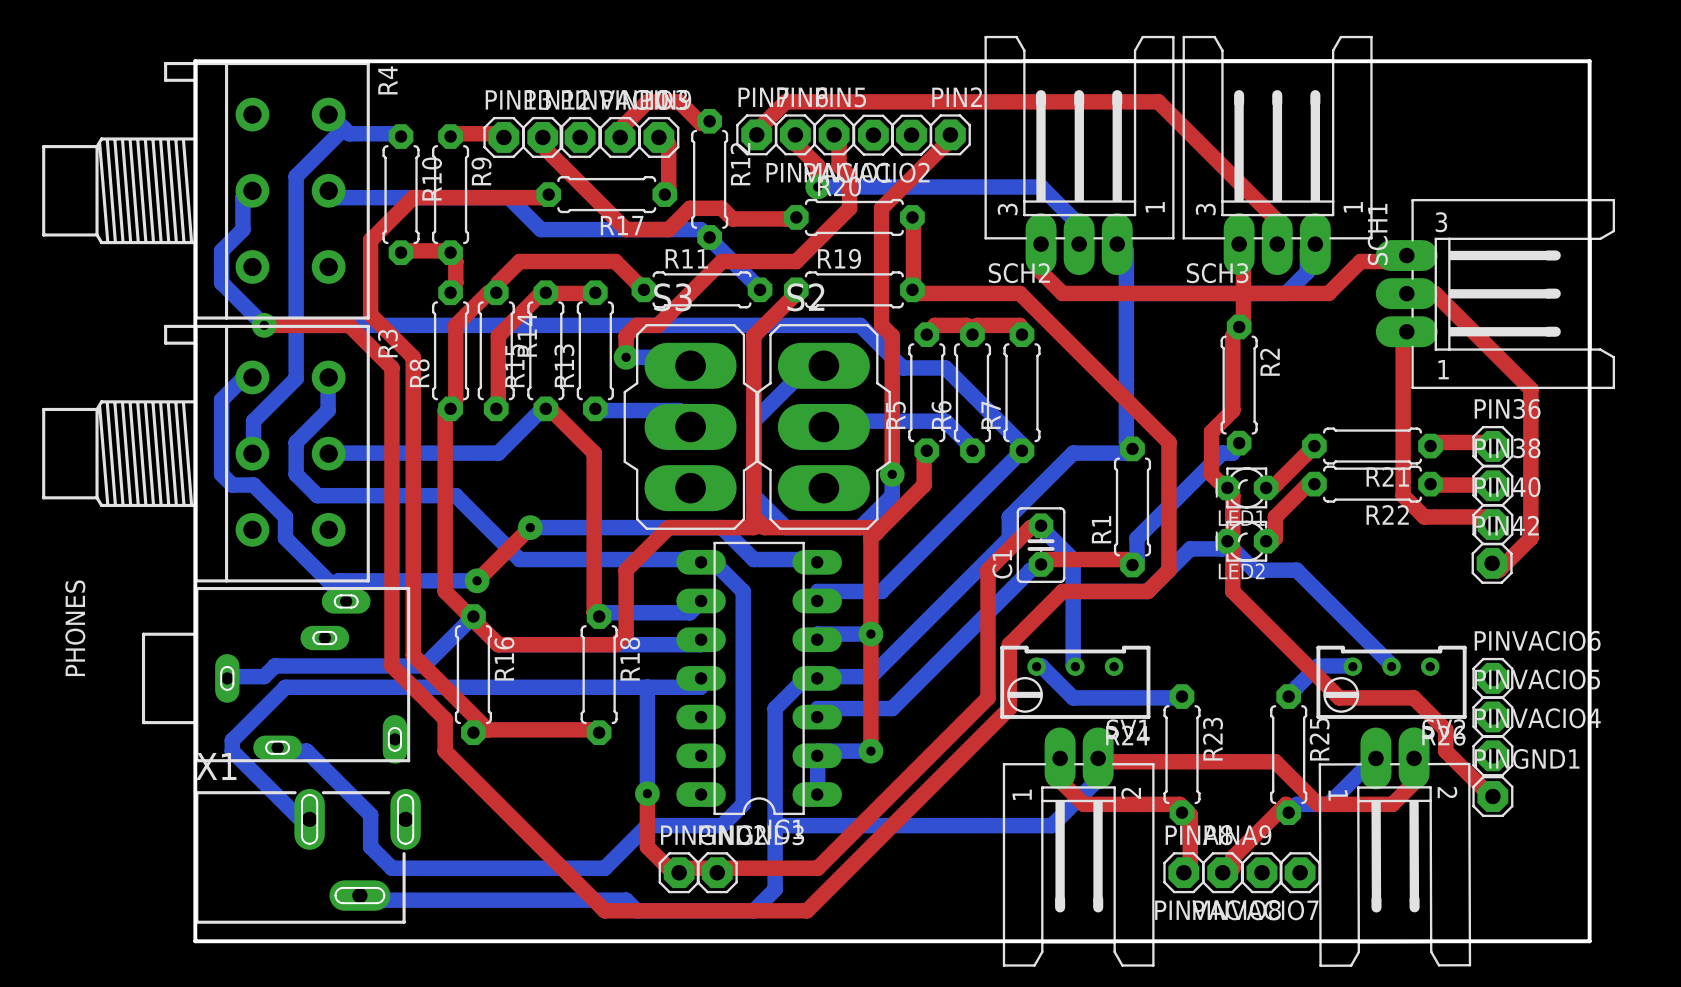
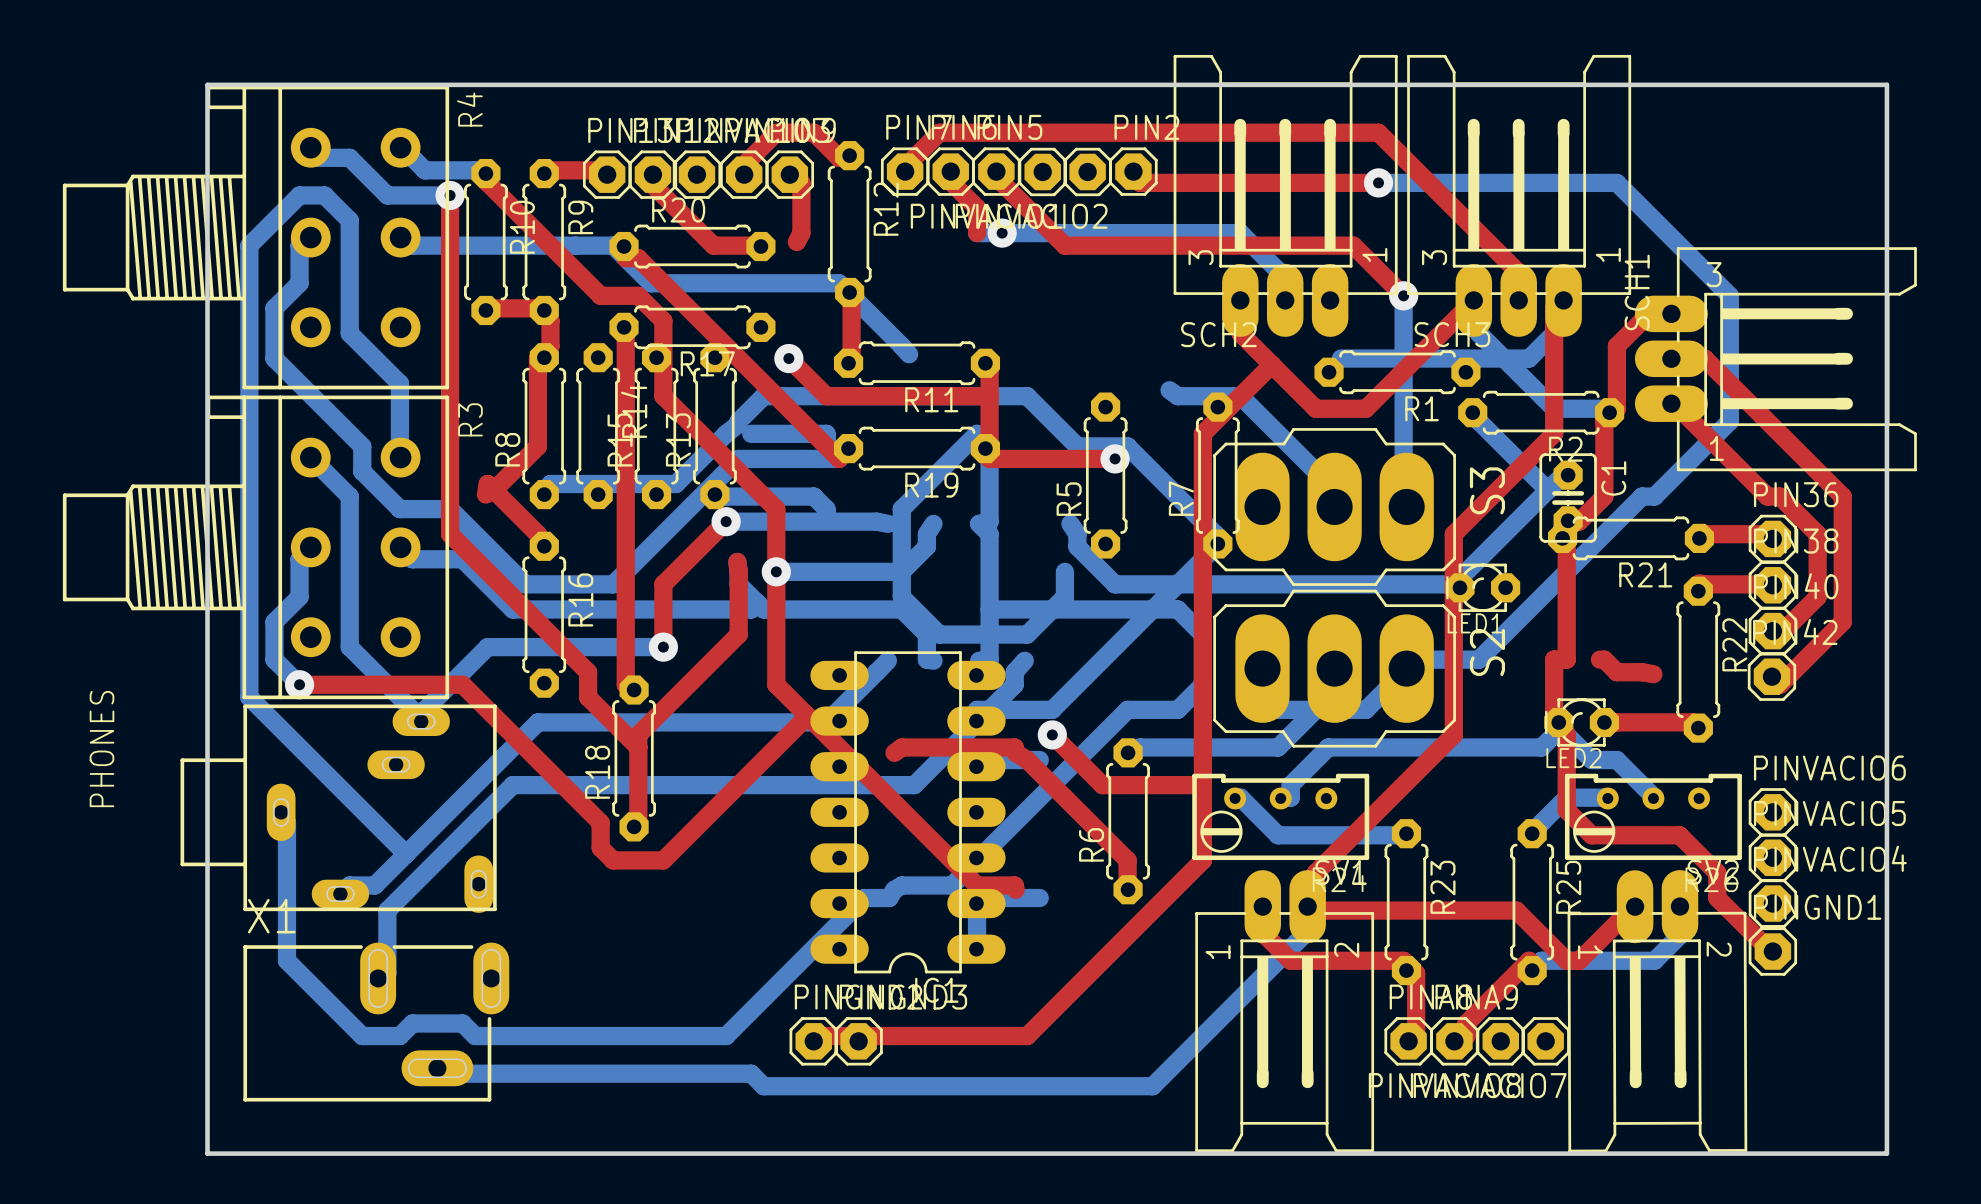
board edge: (195, 61) (195, 941) (1589, 941) -> (243, 84) (207, 84) (207, 1153) (1886, 1153) (1886, 1122)
bottom track: none -> (310, 147) (312, 157) (349, 157) (387, 195) (450, 195)
bottom track: (344, 128) (296, 176) (296, 367) -> none
top track: (950, 134) (945, 144) (881, 208) (881, 325) (892, 336) (892, 474) -> (1133, 171) (1140, 182) (1378, 182)
top track: none -> (485, 173) (487, 182) (600, 295) (638, 295) (663, 320) (663, 396) (776, 509) (776, 684) (977, 885) (1014, 885) (1015, 889)
top track: (839, 144) (839, 165) (849, 176) (849, 208) (796, 261) (721, 261) (658, 325) (636, 325) (626, 336) (626, 357) -> (1002, 182) (1064, 245) (1353, 245) (1403, 295)
bottom track: none -> (1378, 182) (1616, 182) (1729, 295) (1729, 421) (1654, 496) (1642, 496) (1478, 659) (1453, 659)
via: none -> (1378, 182)
via: none -> (450, 195)
via position: (817, 187) -> (1002, 233)
top track: (548, 194) (540, 197) (413, 197) (370, 240) -> (450, 195) (450, 295)
R17 position: (606, 194) -> (692, 327)
top track: (594, 197) (626, 229) (668, 229) (689, 208) (721, 208) (732, 218) (796, 217) -> (713, 245) (760, 246)
top track: none -> (624, 246) (625, 258) (638, 258) (839, 458) (848, 448)
R20 position: (854, 217) -> (692, 246)
top track: (912, 217) (913, 293) (1019, 293) (1168, 442) (1168, 570) (1147, 591) (1062, 591) (1009, 644) -> (1271, 364) (1202, 433) (1202, 772)
top track: none -> (849, 292) (851, 295) (851, 358) (848, 363)
bottom track: none -> (1403, 295) (1403, 496) (1406, 506)
via: none -> (1403, 295)
bottom track: (1117, 244) (1126, 250) (1126, 442) (1132, 448) (1126, 453) (1073, 453) (1009, 516) (1009, 527) -> (989, 609) (1177, 609) (1202, 634)
top track: (1239, 244) (1243, 250) (1243, 325) (1239, 327) (1232, 336) (1232, 410) (1211, 431) (1211, 474) (1227, 487) (1232, 495) (1232, 538) (1227, 541) (1232, 548) (1232, 591) (1317, 676) -> (1554, 659) (1554, 722) (1558, 722) (1566, 734) (1566, 810)
bottom track: none -> (1473, 300) (1478, 308) (1478, 333) (1554, 408) (1604, 408) (1609, 412)
top track: none -> (1563, 300) (1554, 308) (1554, 433) (1453, 534) (1453, 734) (1315, 872) (1315, 898) (1307, 906)
R11 name position: R11 (686, 258) -> R11 (931, 399)
R19 name position: R19 (839, 258) -> R19 (931, 485)
top track: (1381, 261) (1360, 261) (1328, 293) (1062, 293) -> (1473, 300) (1365, 408) (1315, 408) (1265, 358)
top track: none -> (1642, 320) (1616, 346) (1616, 408) (1609, 412) (1604, 421) (1604, 496) (1579, 521) (1566, 521) (1566, 659) (1554, 659)
top track: none -> (624, 327) (625, 333) (625, 684) (634, 690)
bottom track: (221, 282) (264, 325) -> (274, 346) (274, 358) (362, 446)
top track: (643, 289) (615, 261) (519, 261) (498, 282) (496, 292) (487, 293) (455, 325) (455, 399) (450, 408) (445, 410) (445, 591) (466, 612) (473, 616) (477, 623) (498, 644) (615, 644) (626, 634) (626, 570) (668, 527) (753, 527) (759, 522) -> none
R11 position: (702, 289) -> (917, 363)
top track: (796, 289) (796, 293) (753, 336) (753, 516) (764, 527) (870, 527) (876, 532) -> none
R19 position: (854, 289) -> (917, 448)
top track: none -> (548, 357) (537, 358) (537, 446) (494, 490)
top track: (595, 292) (540, 293) (498, 336) (498, 399) (496, 408) -> none
top track: none -> (788, 358) (826, 396) (989, 396)
via: none -> (788, 358)
top track: none -> (985, 363) (989, 371) (989, 446) (985, 448) (989, 458) (1115, 458)
top track: (370, 314) (413, 357) (413, 655) (487, 729) -> (450, 383) (450, 534) (588, 672) (588, 697) (638, 747)
bottom track: none -> (1169, 390) (1177, 396) (1240, 396) (1340, 496) (1334, 506)
top track: (264, 325) (349, 325) (391, 367) (391, 665) (445, 719) (445, 751) (604, 910) (807, 910) (1009, 708) -> none
via: (264, 325) -> none
bottom track: (296, 325) (636, 325) -> (548, 494) (550, 484) (675, 484) (737, 425) (738, 421) (763, 396)
top track: (1406, 331) (1403, 336) (1403, 495) (1424, 516) (1488, 516) (1492, 524) -> (1671, 403) (1679, 408) (1767, 496) (1780, 496) (1817, 534)
top track: (926, 334) (934, 325) (966, 325) (972, 334) (977, 325) (1019, 325) (1022, 334) -> none
bottom track: none -> (1472, 412) (1478, 421) (1547, 490)
via: (626, 357) -> none
bottom track: none -> (848, 448) (839, 458) (738, 458) (613, 584) (525, 584) (450, 509) (399, 509) (362, 471) (362, 458)
bottom track: none -> (985, 448) (989, 458) (989, 521) (979, 523) (989, 534) (989, 659) (979, 660)
bottom track: (252, 377) (242, 378) (221, 399) (221, 474) (232, 485) (253, 485) (285, 516) -> (310, 457) (349, 496) (349, 622)
bottom track: (328, 377) (328, 410) (296, 442) (296, 474) (317, 495) (455, 495) (519, 559) (700, 559) (701, 562) (711, 559) (743, 591) (743, 804) (721, 825) (647, 825) -> (400, 457) (399, 383) (349, 333) (349, 220) (324, 195) (299, 195) (249, 245) (249, 697) (406, 854)
bottom track: (296, 378) (253, 421) (252, 453) -> (299, 684) (274, 659) (274, 622) (299, 596) (299, 559) (310, 547)
via: none -> (1115, 458)
R2 rotation: 0° (1239, 385) -> 90° clockwise (1541, 412)
top track: (1530, 389) (1530, 442) -> (1817, 471) (1842, 496) (1842, 622) (1817, 647)
R6 position: (972, 392) -> (1128, 821)
bottom track: none -> (1568, 475) (1566, 471) (1453, 584) (1115, 584) (1077, 546) (1077, 534) (1070, 523)
top track: none -> (485, 494) (487, 484) (537, 534) (544, 546)
top track: (545, 408) (551, 410) (594, 453) (594, 612) (599, 616) -> none
bottom track: (545, 408) (540, 410) (498, 453) (328, 453) -> (757, 603) (751, 609) (512, 609) (462, 559) (412, 559) (400, 547)
S3 rotation: 0° (690, 426) -> 90° clockwise (1334, 506)
S3 position: (690, 426) -> (1334, 506)
bottom track: (823, 426) (828, 421) (945, 421) (972, 450) -> none
S2 rotation: 0° (823, 426) -> 90° clockwise (1334, 668)
S2 position: (823, 426) -> (1334, 668)
top track: none -> (726, 521) (663, 584) (663, 647)
bottom track: none -> (726, 521) (876, 521) (887, 523)
via: none -> (726, 521)
bottom track: none -> (933, 523) (926, 534) (926, 546) (901, 571) (776, 571)
bottom track: (1239, 443) (1232, 453) (1222, 453) (1137, 538) (1137, 559) (1132, 565) -> none
top track: (1314, 446) (1275, 485) (1266, 487) -> none
top track: (926, 450) (924, 453) (924, 485) (870, 538) (870, 751) -> none
top track: none -> (737, 561) (738, 634) (638, 734) (638, 822) (634, 826)
bottom track: none -> (737, 561) (738, 584) (763, 609) (901, 609) (926, 634) (926, 659) (933, 660)
via: none -> (776, 571)
via: (892, 474) -> none
top track: (1314, 484) (1307, 485) (1275, 516) (1275, 538) (1266, 541) -> none
R22 rotation: 0° (1372, 484) -> 90° clockwise (1698, 659)
R22 position: (1372, 484) -> (1698, 659)
top track: (1530, 495) (1530, 538) -> (1817, 596) (1780, 634) (1772, 631)
R1 rotation: 0° (1132, 506) -> 90° clockwise (1397, 372)
R1 position: (1132, 506) -> (1397, 372)
R22 name position: R22 (1387, 514) -> R22 (1734, 644)
top track: (1041, 525) (1030, 527) (988, 570) (988, 697) (817, 868) -> (1202, 847) (1202, 860) (1027, 1036) (977, 1036)
bottom track: (1041, 525) (1073, 559) (1073, 665) (1075, 666) -> none
top track: (530, 527) (477, 580) -> none
bottom track: (530, 527) (721, 527) (753, 559) (807, 559) (817, 562) -> none
via position: (530, 527) -> (663, 647)
R1 name position: R1 (1101, 529) -> R1 (1422, 408)
bottom track: none -> (663, 647) (487, 647) (425, 709) (421, 721)
bottom track: (1009, 538) (870, 676) (817, 676) (817, 678) (807, 676) (775, 708) (775, 889) (753, 910) -> (1202, 647) (1202, 684) (1177, 709) (1127, 709) (951, 885) (901, 885) (894, 889) (889, 898) (864, 898) (776, 985)
LED2 position: (1246, 541) -> (1581, 722)
C1 position: (1041, 545) -> (1568, 497)
bottom track: (1222, 548) (1227, 541) (1254, 570) (1296, 570) (1360, 634) -> (1280, 798) (1290, 797) (1290, 785) (1328, 747) (1541, 747) (1554, 734) (1558, 722) (1566, 734) (1591, 760) (1616, 760)
top track: none -> (1599, 659) (1604, 659) (1616, 672) (1653, 674)
bottom track: none -> (887, 660) (826, 722) (537, 722) (374, 885) (349, 885) (340, 894)
bottom track: none -> (1334, 668) (1328, 672) (1328, 697) (1278, 747) (1140, 747) (1128, 752)
C1 name position: C1 (1002, 564) -> C1 (1613, 478)
top track: (1041, 564) (1041, 559) (1126, 559) (1132, 565) -> none
bottom track: (1041, 564) (1030, 570) (892, 708) (817, 708) (817, 717) -> none
top track: none -> (299, 684) (462, 684) (600, 822) (600, 847) (613, 860) (663, 860) (807, 716)
via: none -> (299, 684)
bottom track: (477, 580) (338, 580) (333, 586) -> none
via: (477, 580) -> none
bottom track: (701, 601) (689, 612) (604, 612) (599, 616) -> none
top track: none -> (1604, 722) (1692, 722) (1698, 728)
top track: none -> (1052, 734) (1102, 785) (1202, 785)
top track: none -> (894, 752) (901, 747) (1014, 747) (1015, 752) (1027, 760) (1127, 860) (1128, 889)
via position: (870, 634) -> (1052, 734)
bottom track: (701, 639) (700, 644) (498, 644) (477, 623) (473, 616) (423, 665) (274, 665) (264, 676) (232, 676) (227, 678) -> none
R18 name position: R18 (630, 659) -> R18 (597, 772)
R16 position: (473, 674) -> (544, 614)
R18 position: (599, 674) -> (634, 758)
bottom track: (701, 678) (700, 687) (285, 687) (232, 740) -> (281, 812) (287, 822) (287, 885)
bottom track: (647, 687) (647, 793) -> none
top track: (473, 732) (477, 729) (594, 729) (599, 732) -> none
bottom track: (277, 747) (285, 751) (306, 751) (370, 815) (370, 846) (381, 857) -> (287, 898) (287, 960) (362, 1036) (399, 1036) (412, 1023) (462, 1023)
bottom track: (232, 751) (306, 825) (309, 819) -> (1024, 660) (1014, 672) (1014, 684) (914, 785) (512, 785) (387, 910) (387, 973) (378, 978)
via: (870, 751) -> none
bottom track: (1375, 758) (1328, 804) -> (1679, 906) (1679, 935) (1654, 960) (1579, 960)
top track: (1414, 758) (1413, 783) (1392, 804) (1328, 804) -> (1635, 906) (1579, 960)
top track: (647, 793) (647, 846) (668, 868) (679, 872) -> none
via: (647, 793) -> none
bottom track: (775, 825) (1051, 825) -> (901, 1086) (1152, 1086) (1253, 985)

